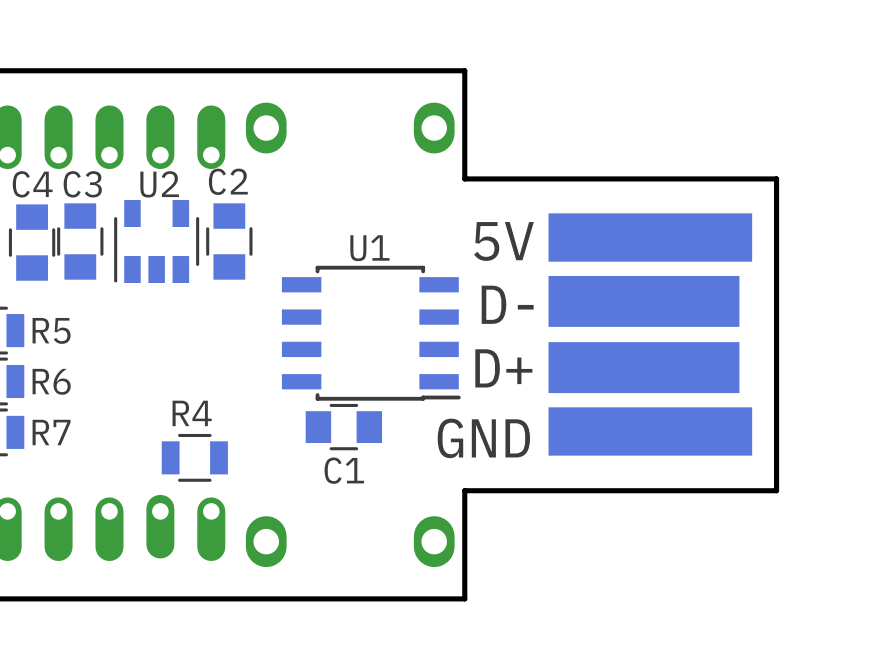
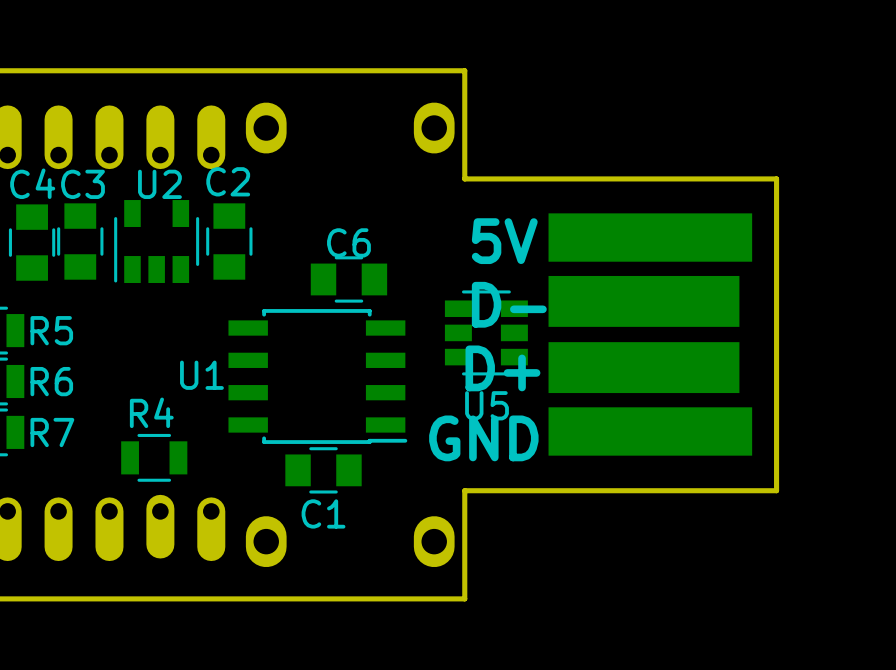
U1 name position: U1 (369, 248) -> U1 (201, 375)
C6: none -> (348, 279)
U5: none -> (486, 332)
U1 position: (371, 333) -> (317, 376)
C1 position: (343, 427) -> (323, 470)
R4 position: (194, 457) -> (154, 457)

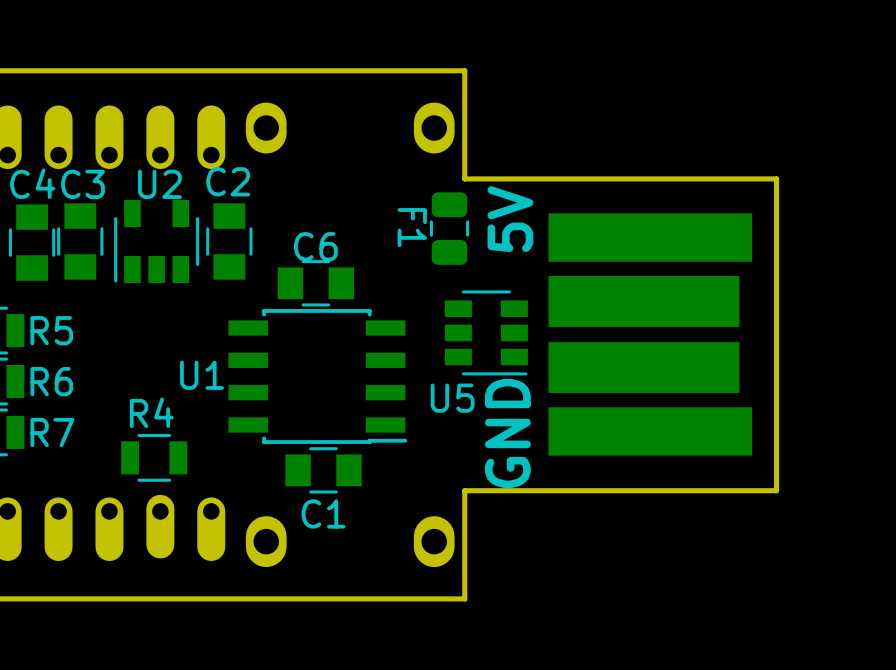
F1: none -> (449, 228)
text rotation: 0° (504, 241) -> 90° counterclockwise (510, 219)
C6 position: (348, 279) -> (315, 283)
text: D- (509, 304) -> none
text: D+ (502, 368) -> none
U5 name position: U5 (487, 405) -> U5 (452, 398)
text rotation: 0° (483, 438) -> 90° counterclockwise (507, 433)

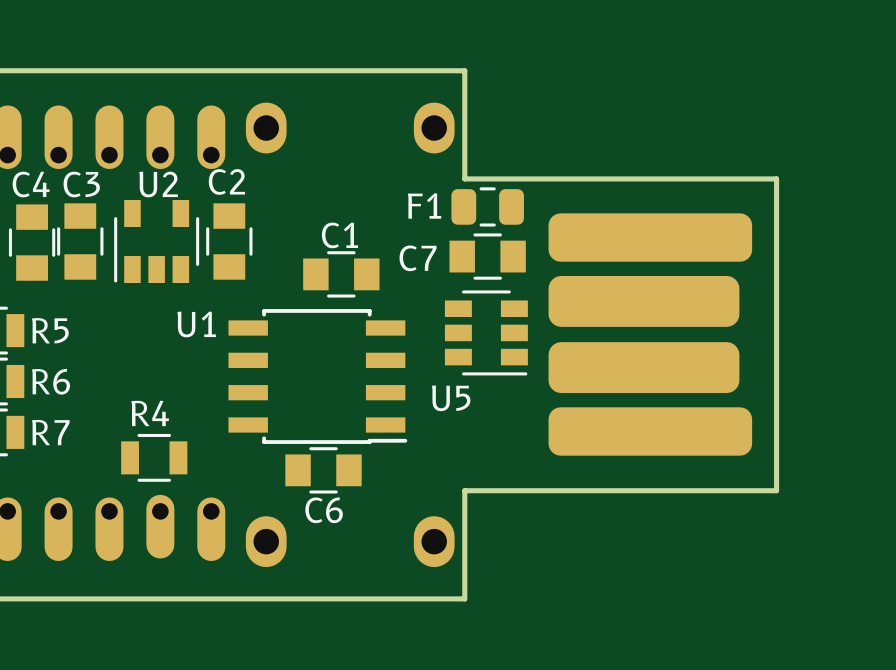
part footprint: [548, 213, 753, 456] -> [548, 213, 753, 456]
text: 5V (510, 219) -> none
F1 rotation: 0° (449, 228) -> 90° clockwise (487, 206)
F1 position: (449, 228) -> (487, 206)
C7: none -> (487, 256)
C1: none -> (341, 274)
C6: (315, 283) -> none
U1 name position: U1 (201, 375) -> U1 (196, 324)
text: GND (507, 433) -> none
C1 name: C1 (323, 513) -> C6 (324, 510)

